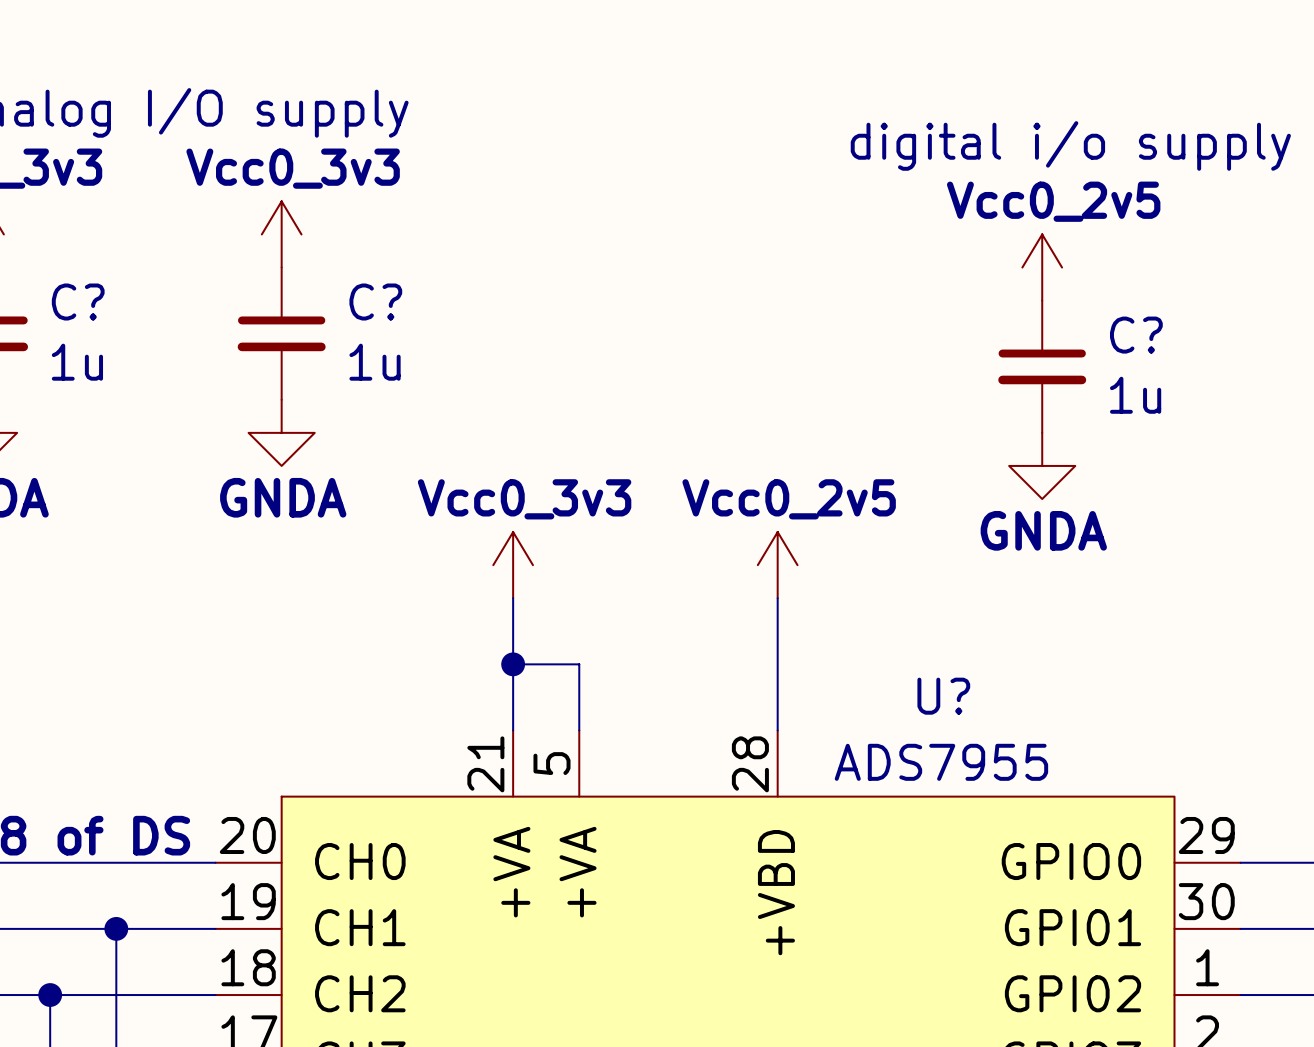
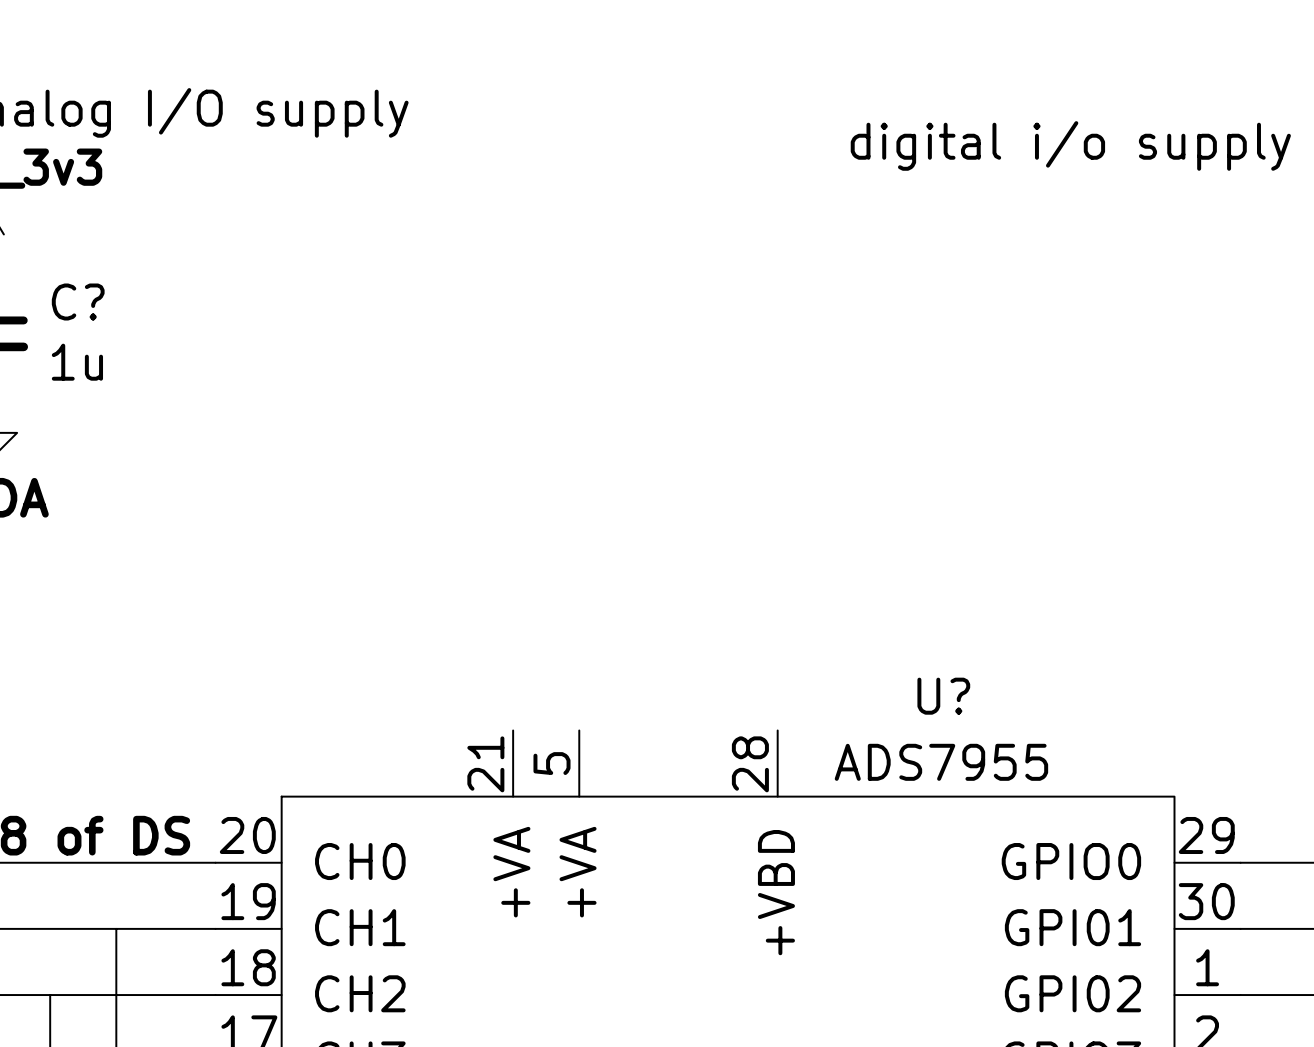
part: Vcc0_3v3 (281, 234) -> none
part: Vcc0_2v5 (1042, 267) -> none
C?: 1u (281, 333) -> none
C?: 1u (1042, 366) -> none
power symbol: GNDA (281, 432) -> none
power symbol: GNDA (1042, 465) -> none
part: Vcc0_3v3 (513, 565) -> none
part: Vcc0_2v5 (777, 565) -> none
wire: (513, 598) (513, 730) -> none
wire: (777, 598) (777, 730) -> none
wire: (513, 664) (579, 664) (579, 730) -> none
junction: (513, 664) -> none
junction: (116, 928) -> none
junction: (50, 995) -> none

